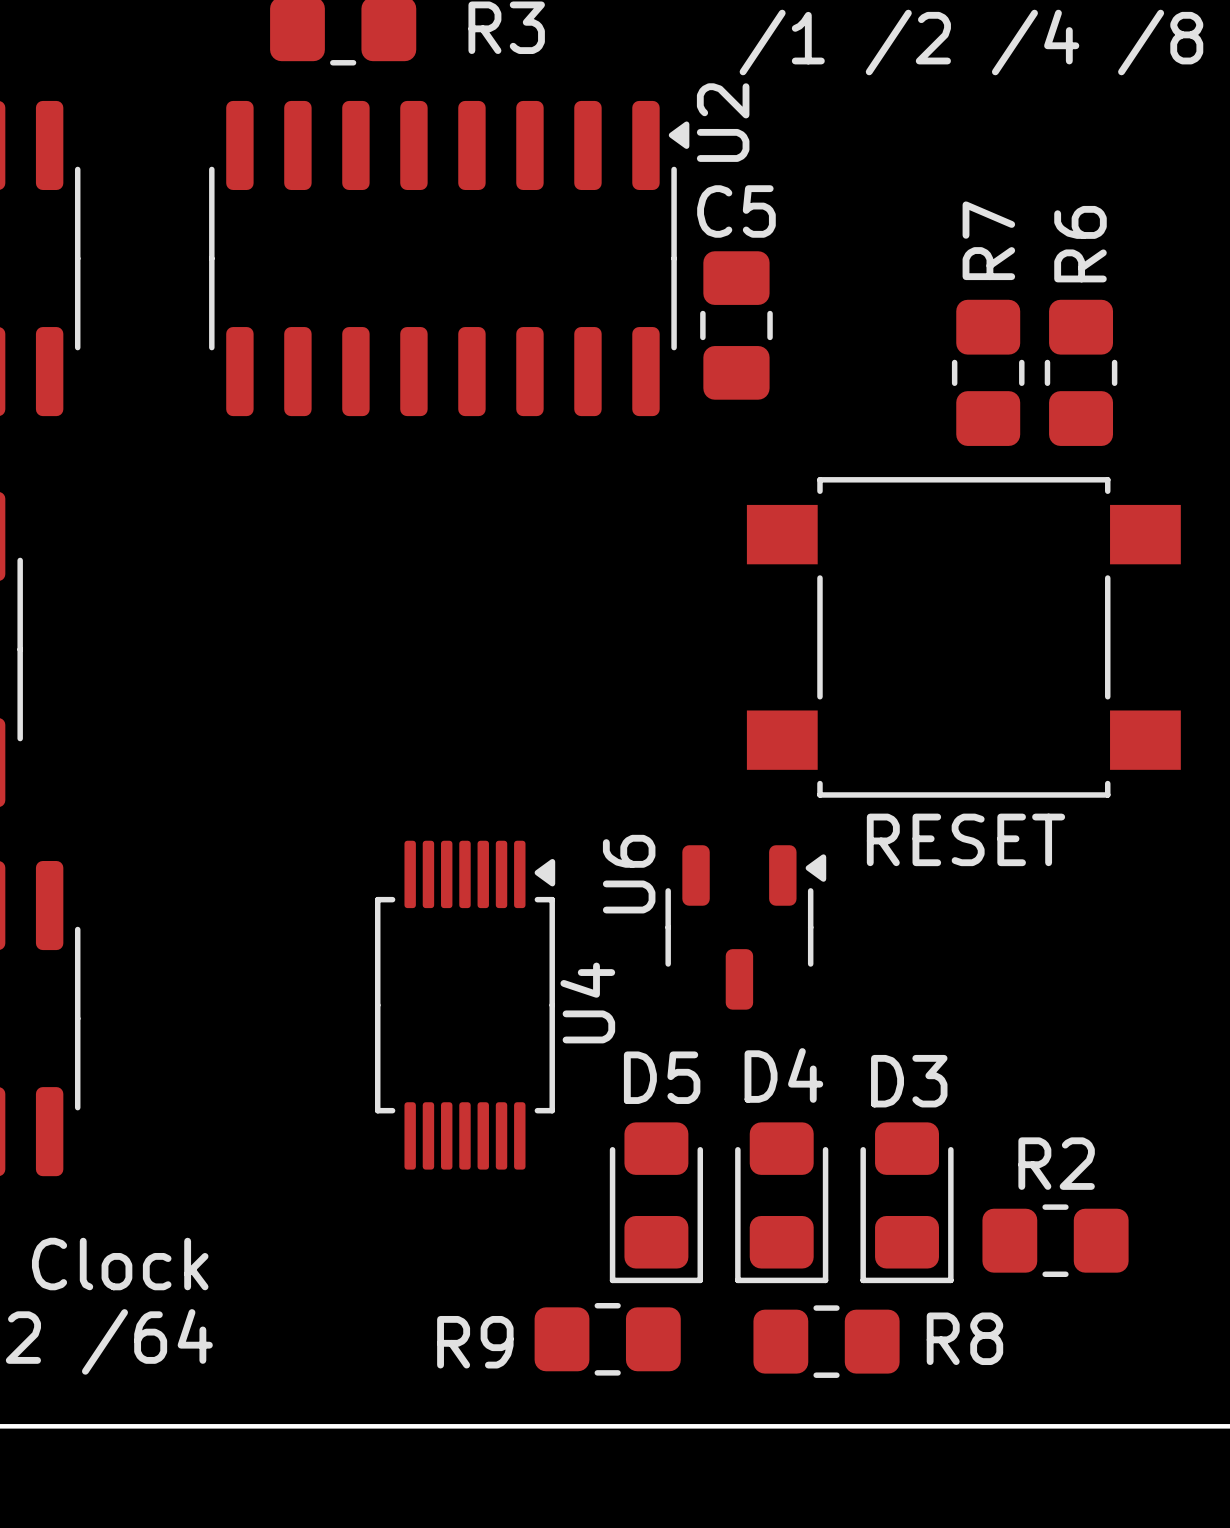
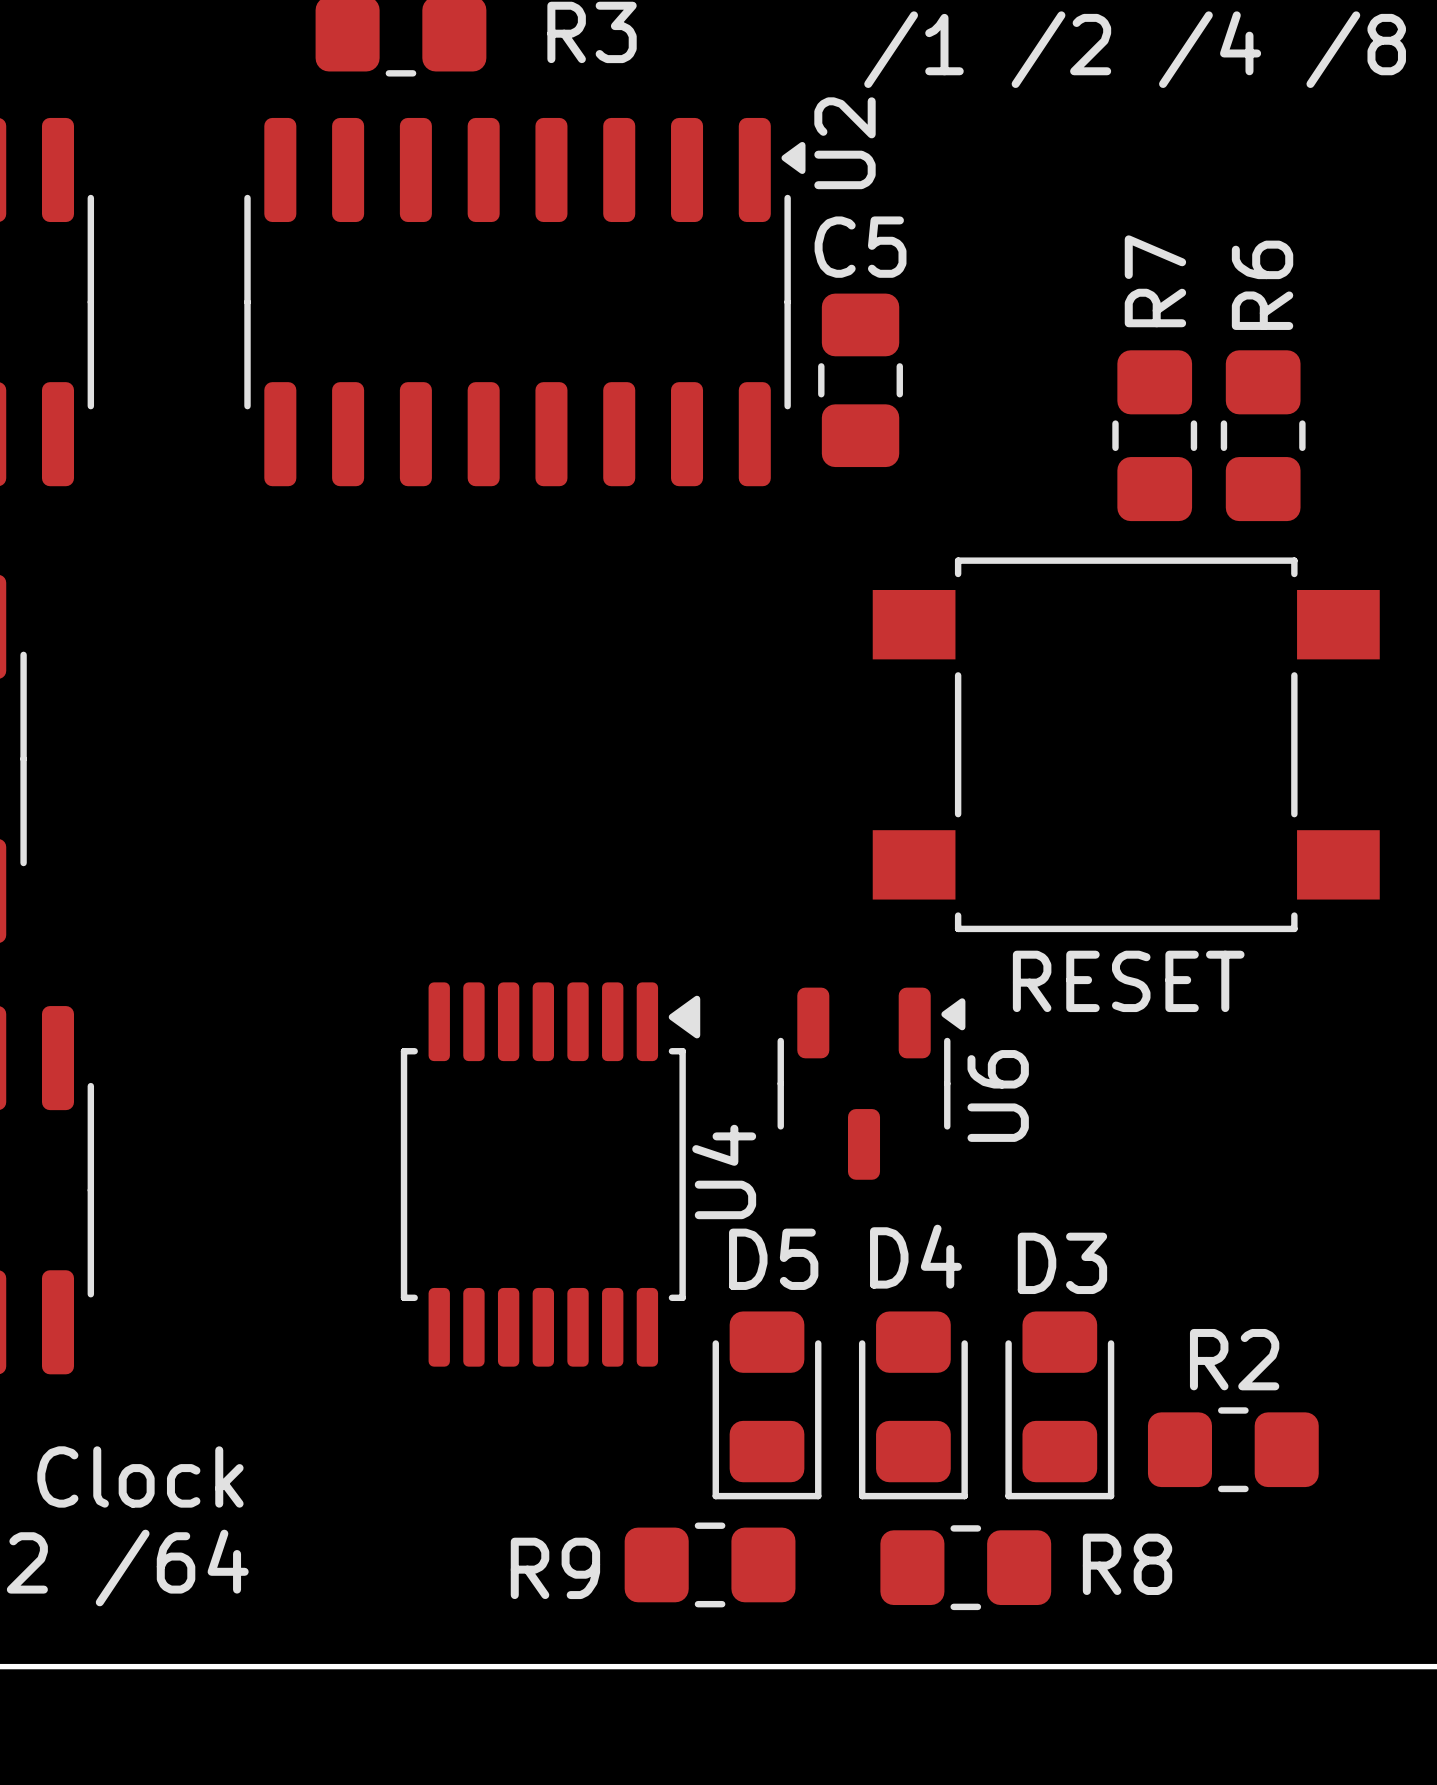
U4 footprint: [375, 840, 556, 1170] -> [400, 982, 701, 1367]
U6 name position: U6 (629, 874) -> U6 (998, 1095)
U4 name position: U4 (587, 1002) -> U4 (724, 1171)

